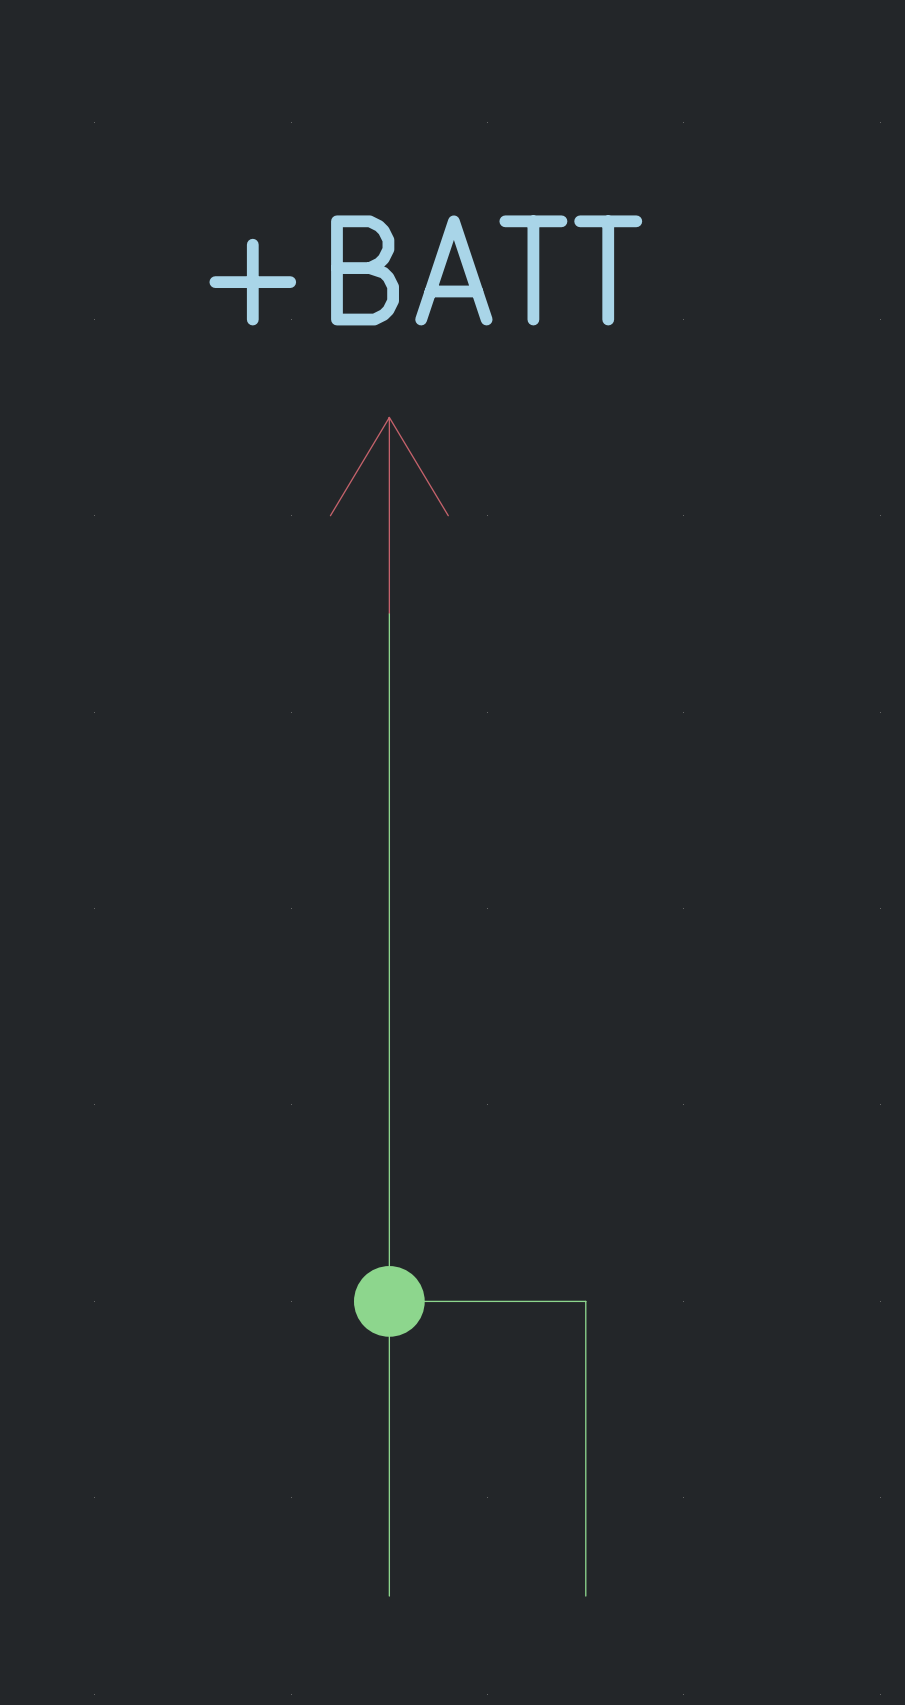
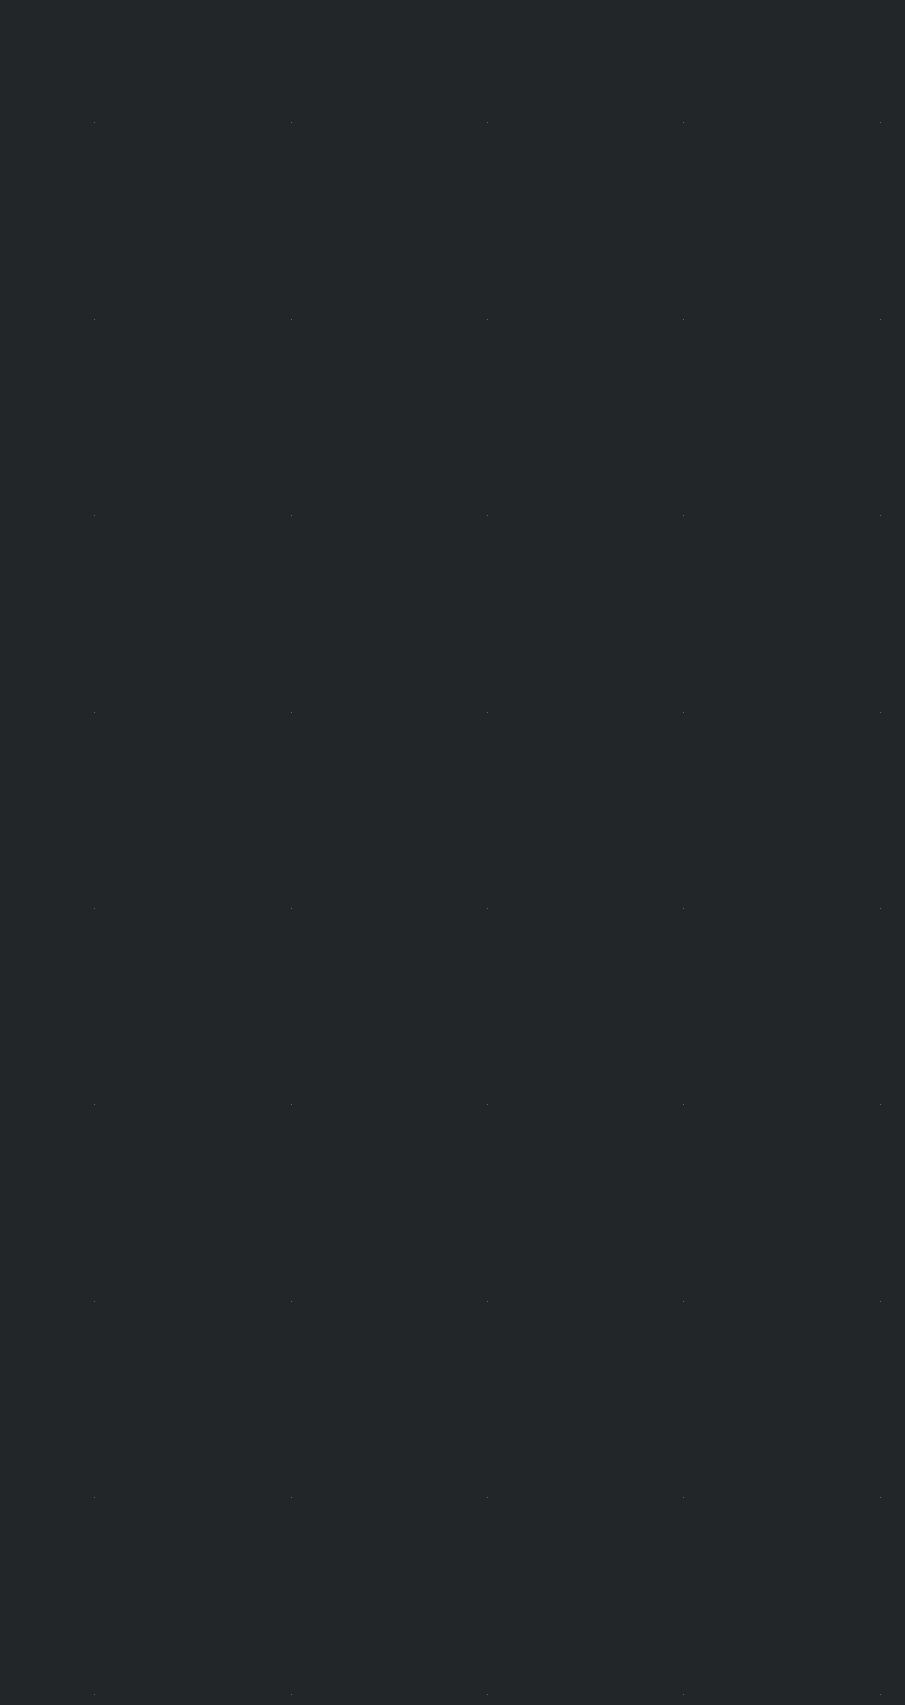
power symbol: +BATT (389, 515) -> none
wire: (389, 613) (389, 1596) -> none
wire: (389, 1301) (585, 1301) (585, 1596) -> none
junction: (389, 1301) -> none

